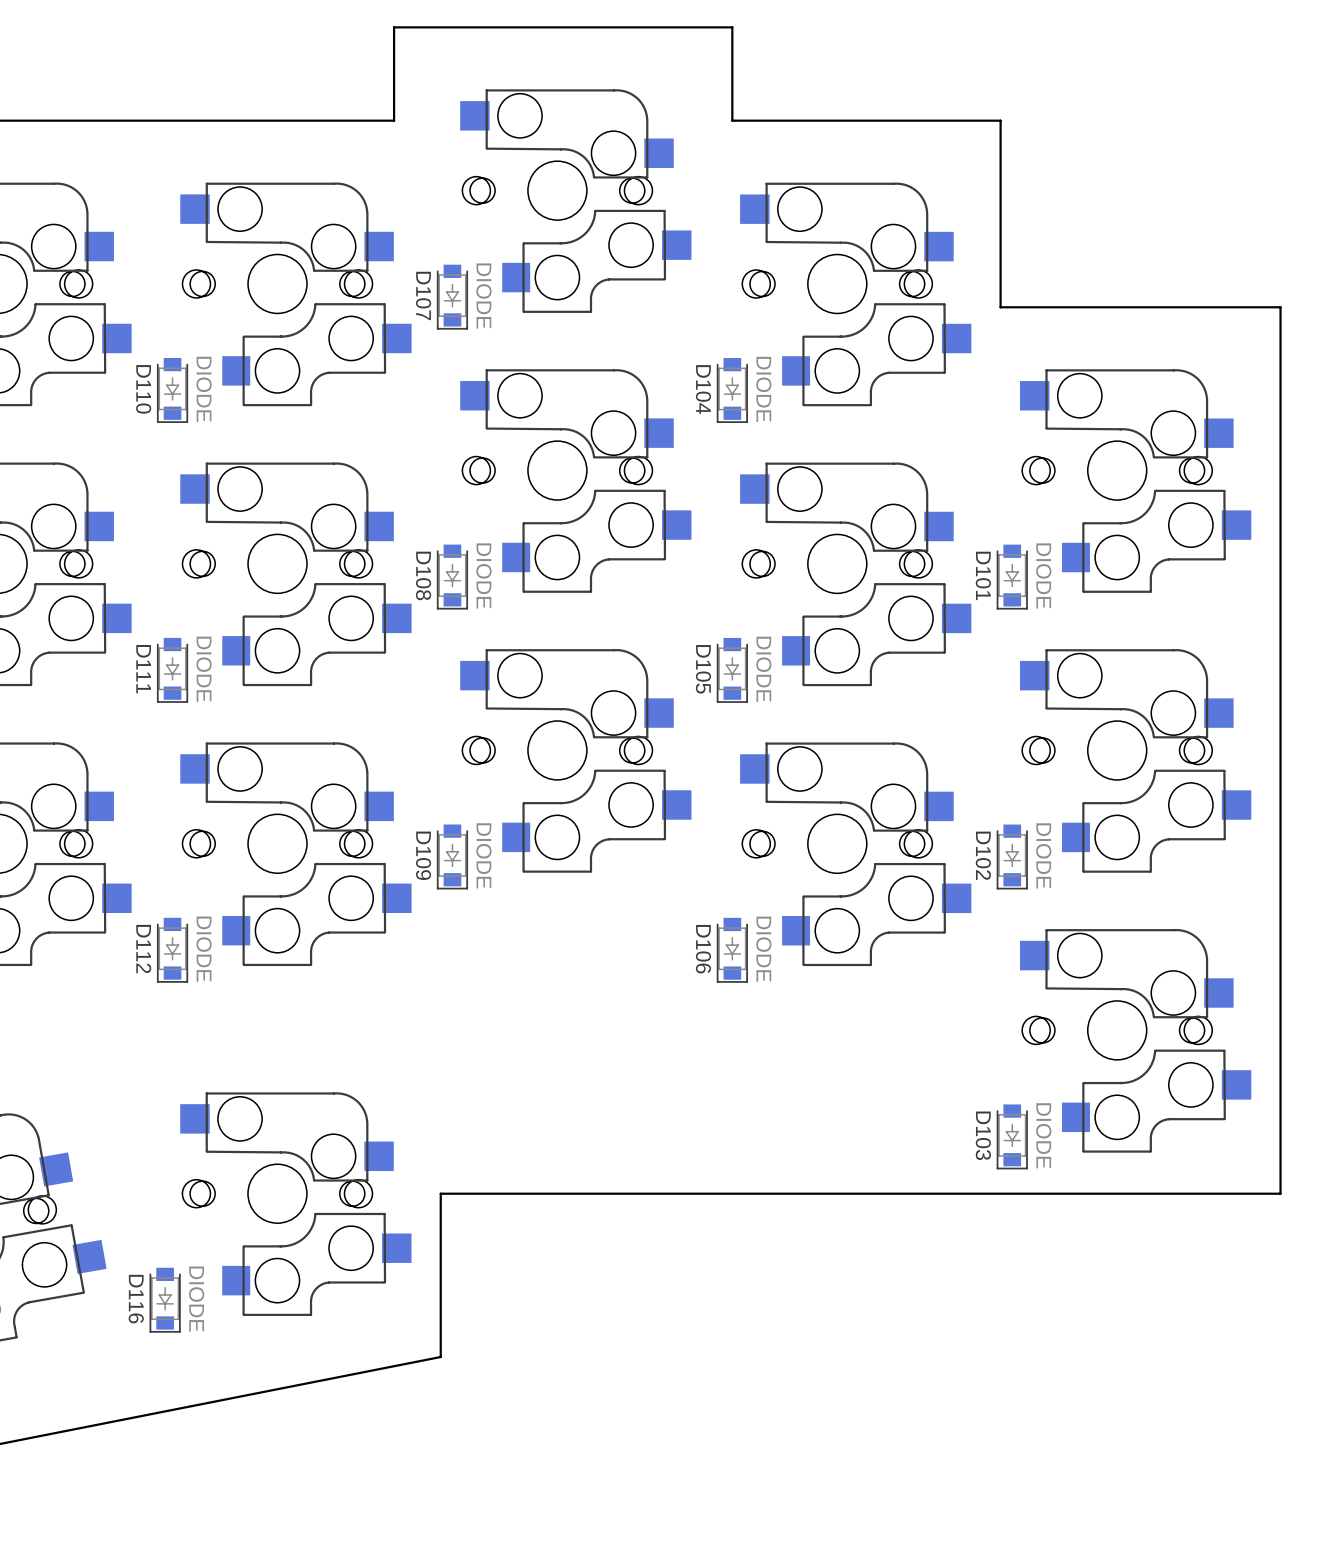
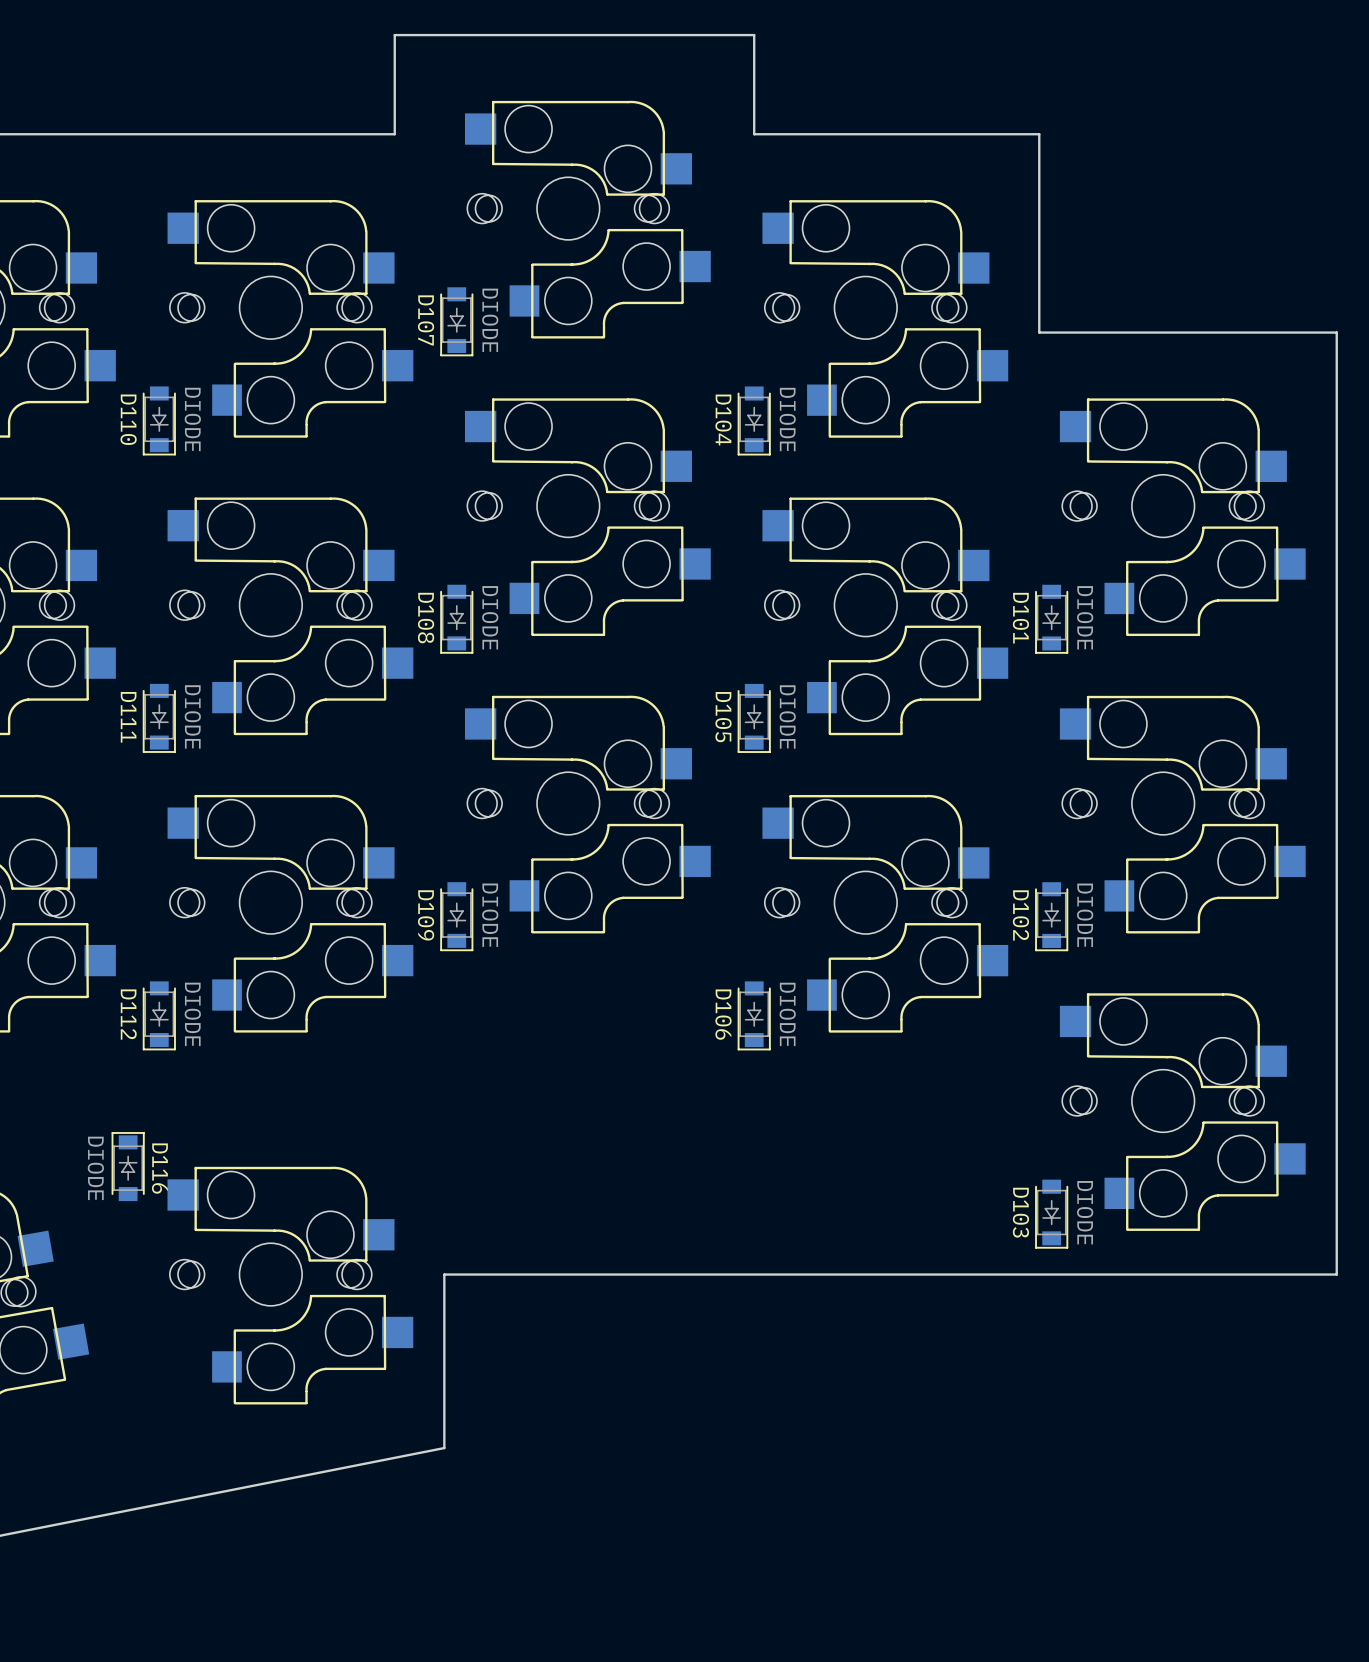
D116 rotation: 0° (165, 1300) -> 180° (128, 1166)
D116 position: (165, 1300) -> (128, 1166)

